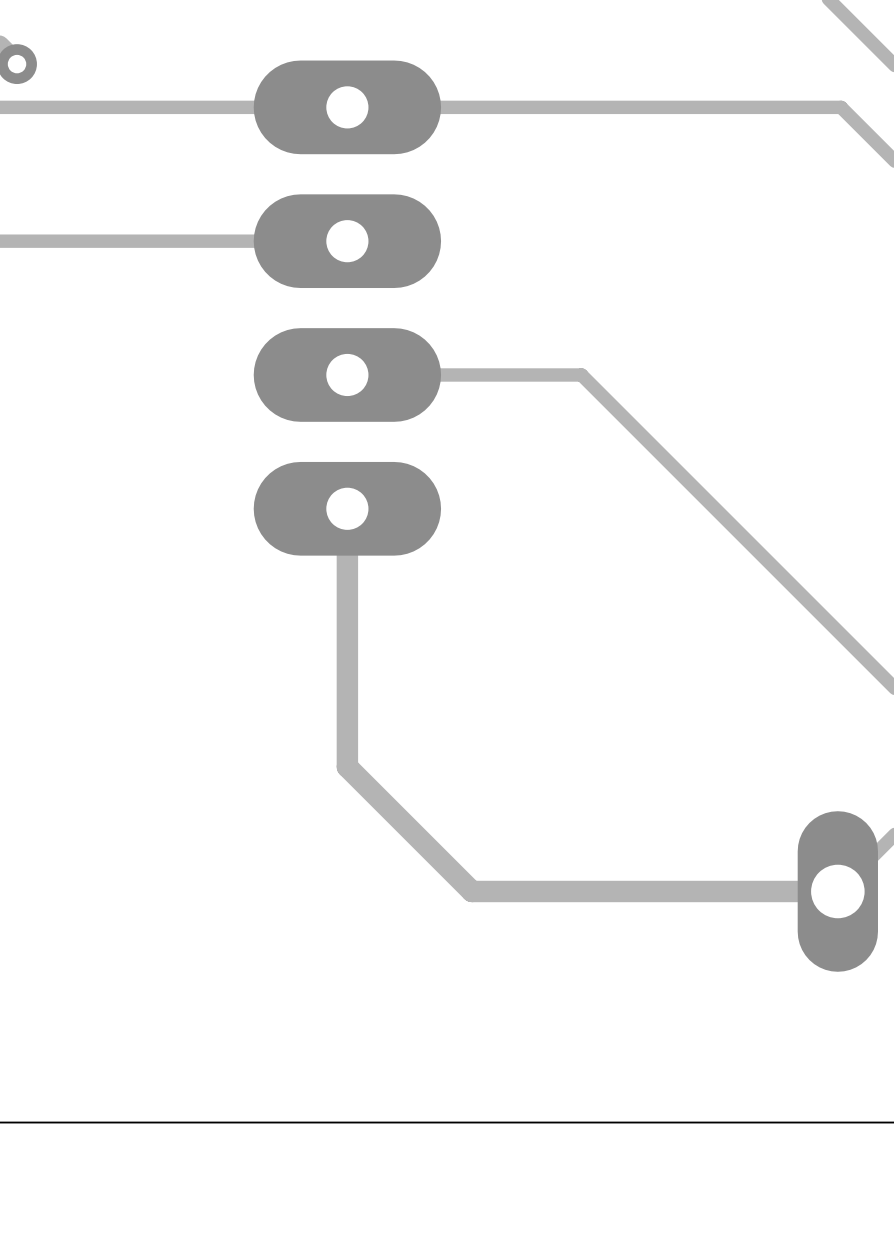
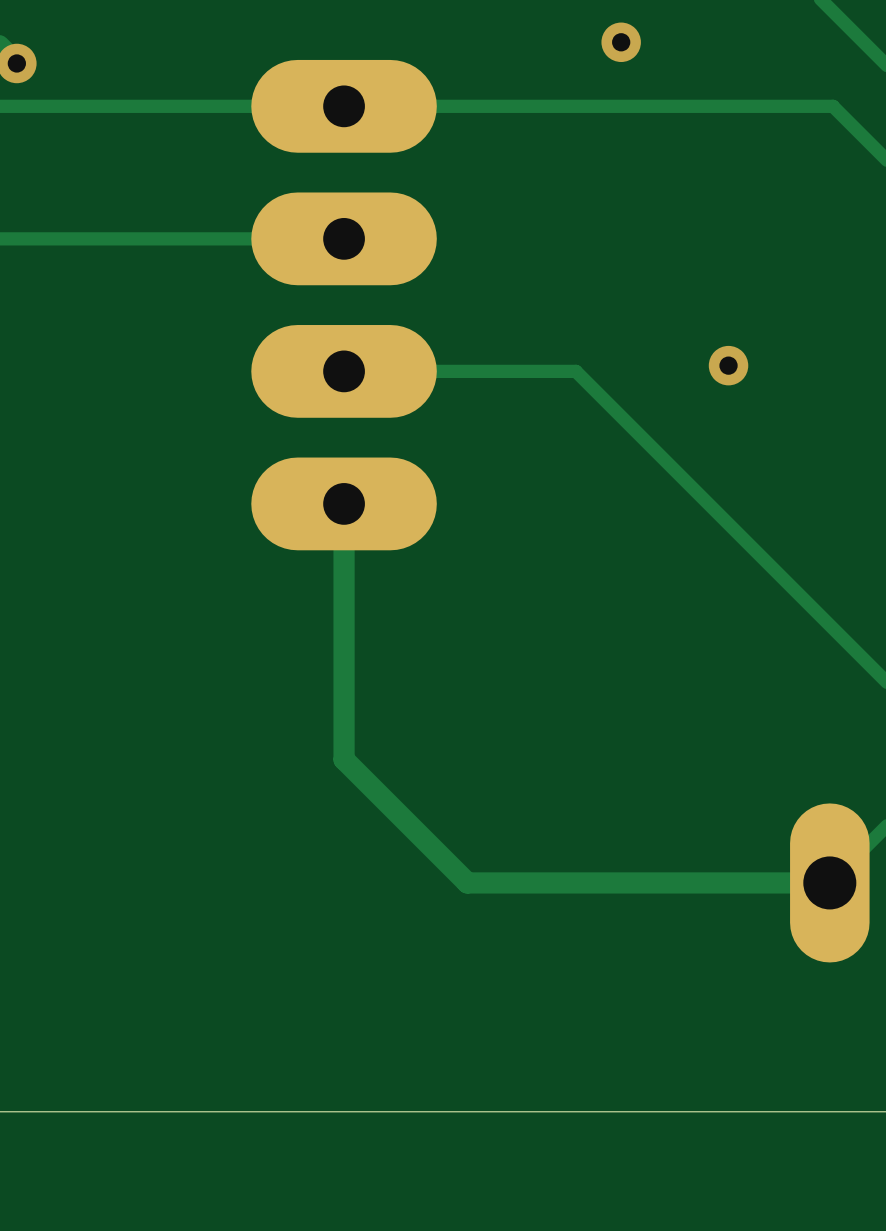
via: none -> (621, 42)
via: none -> (728, 365)

